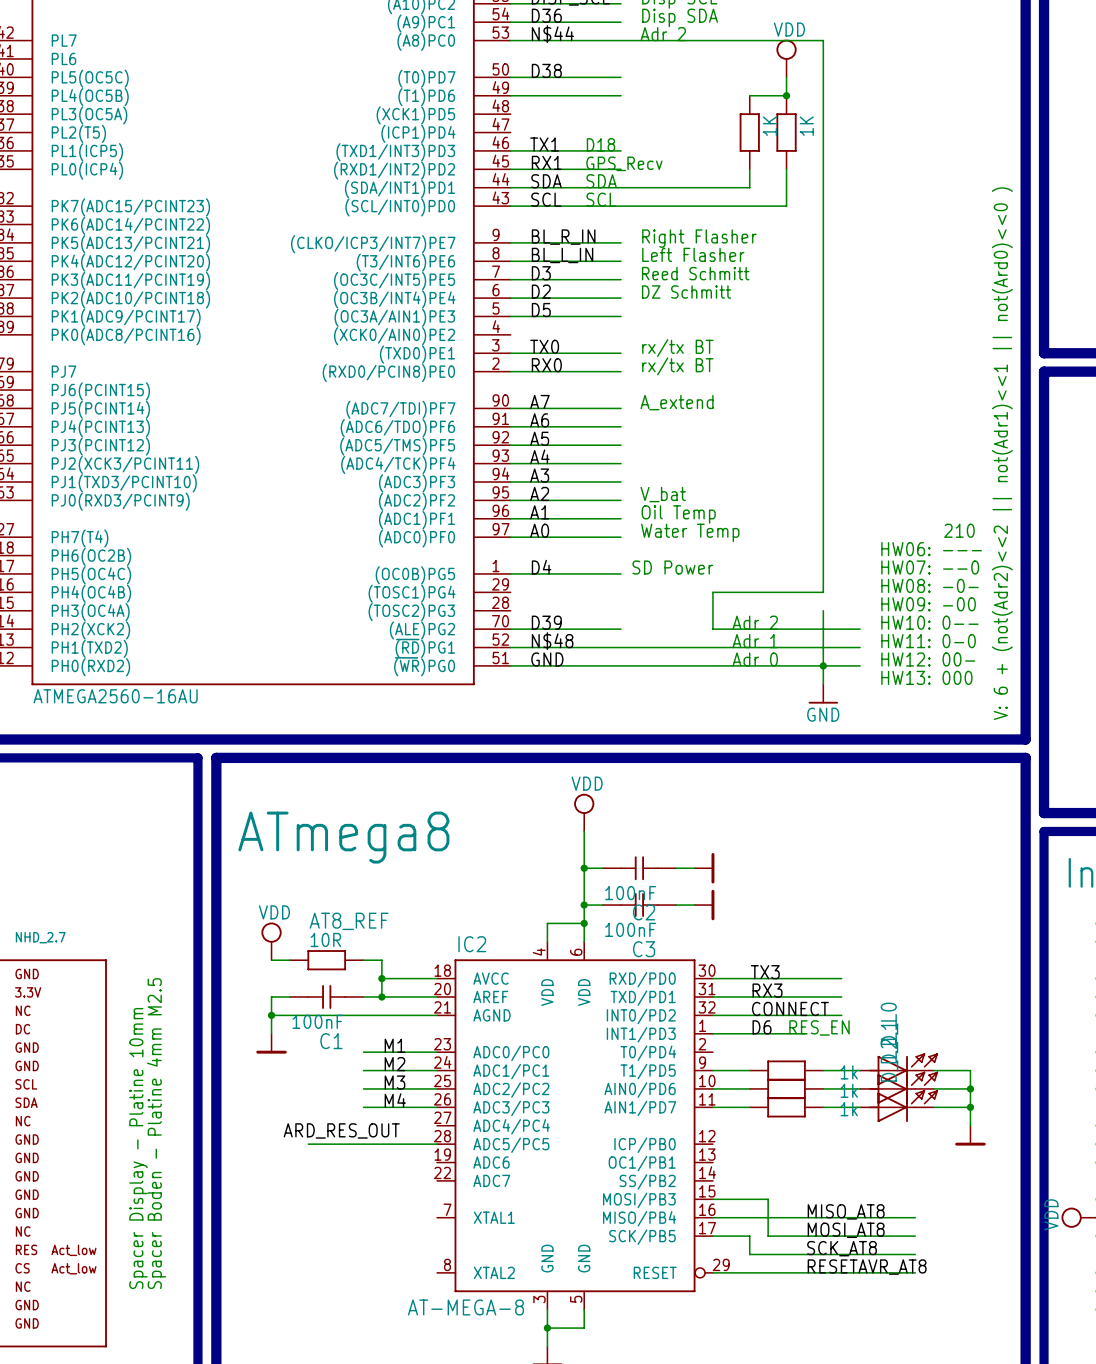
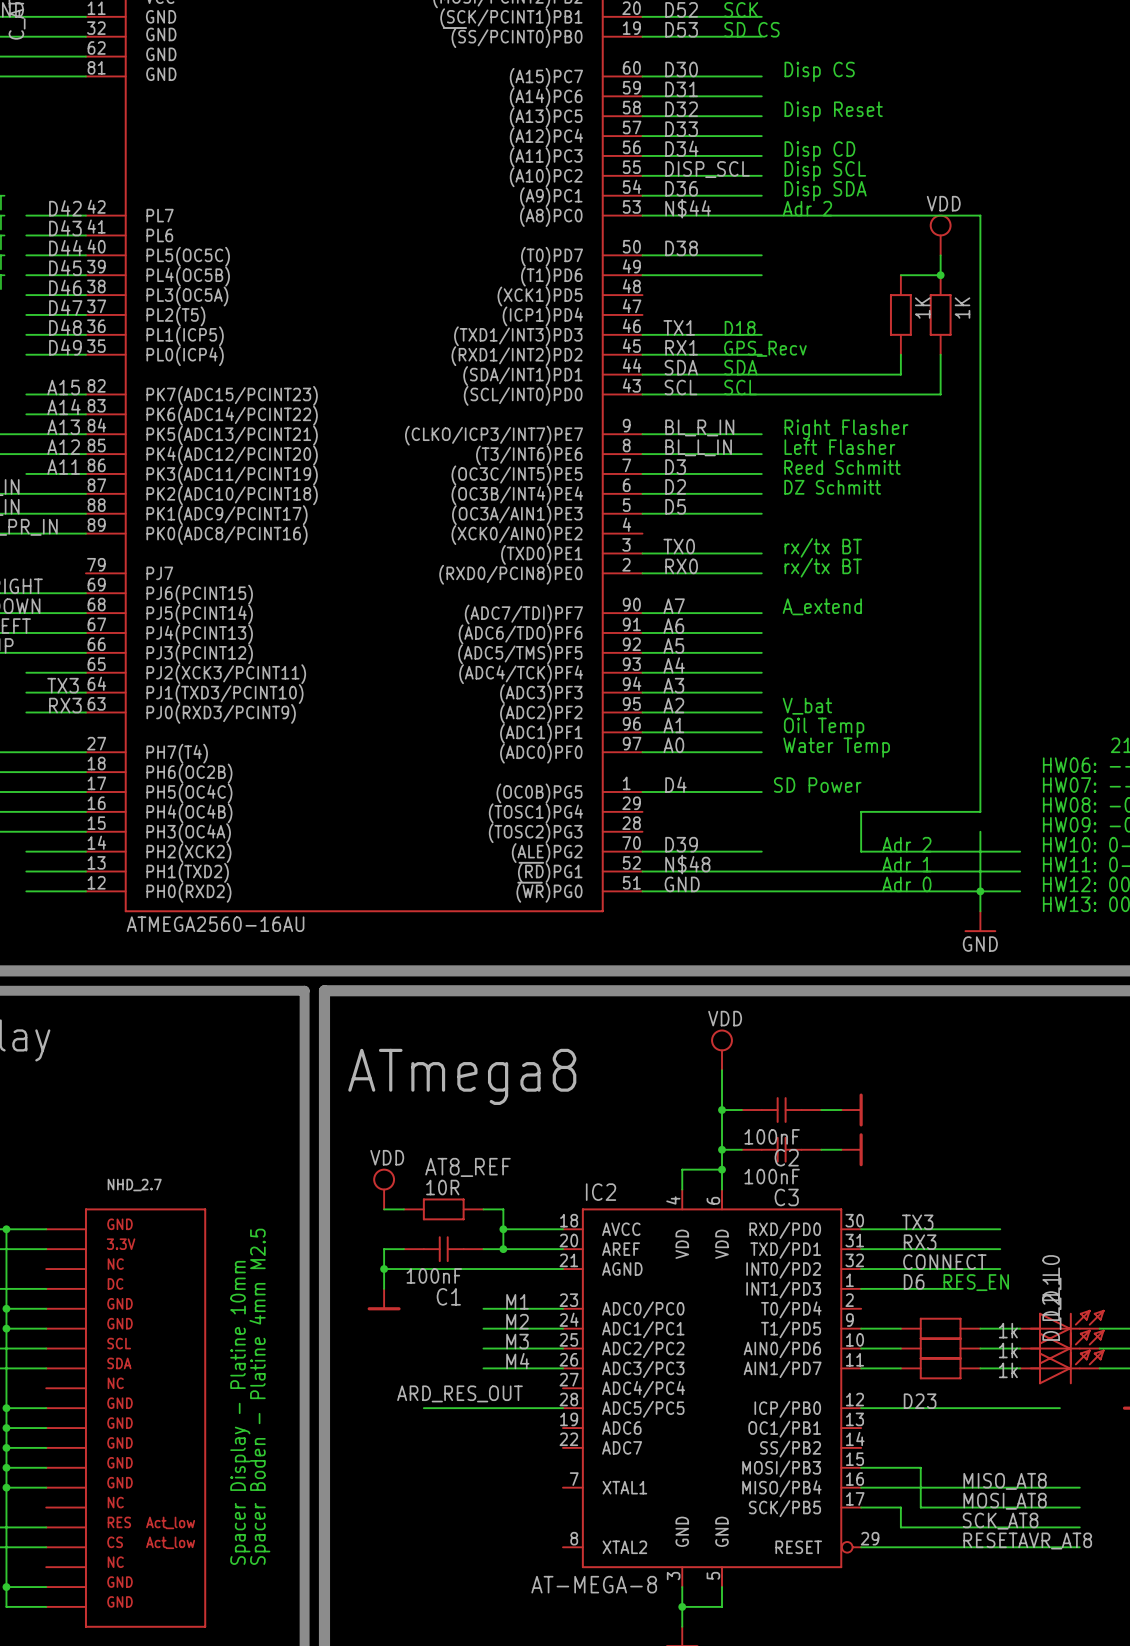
label: none -> D23 (920, 1401)
wire: none -> (861, 1408) (1059, 1408)

